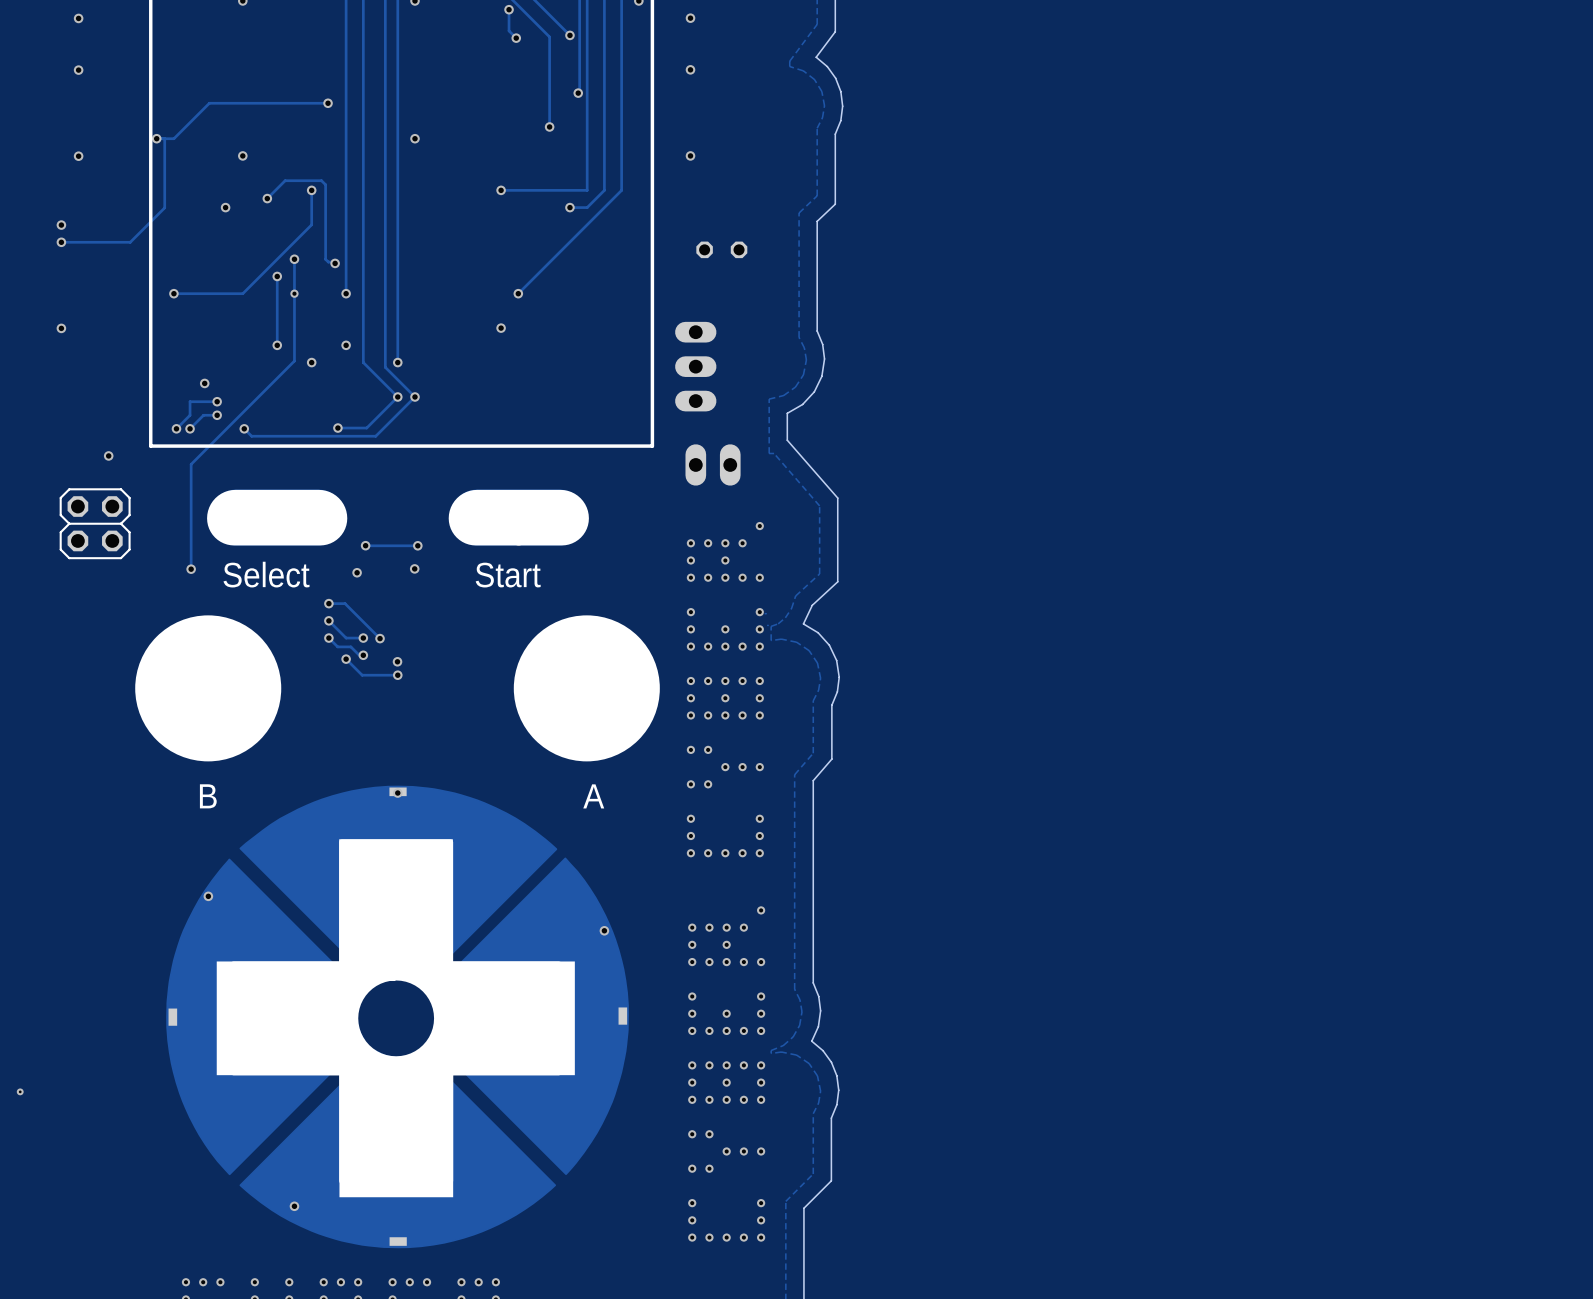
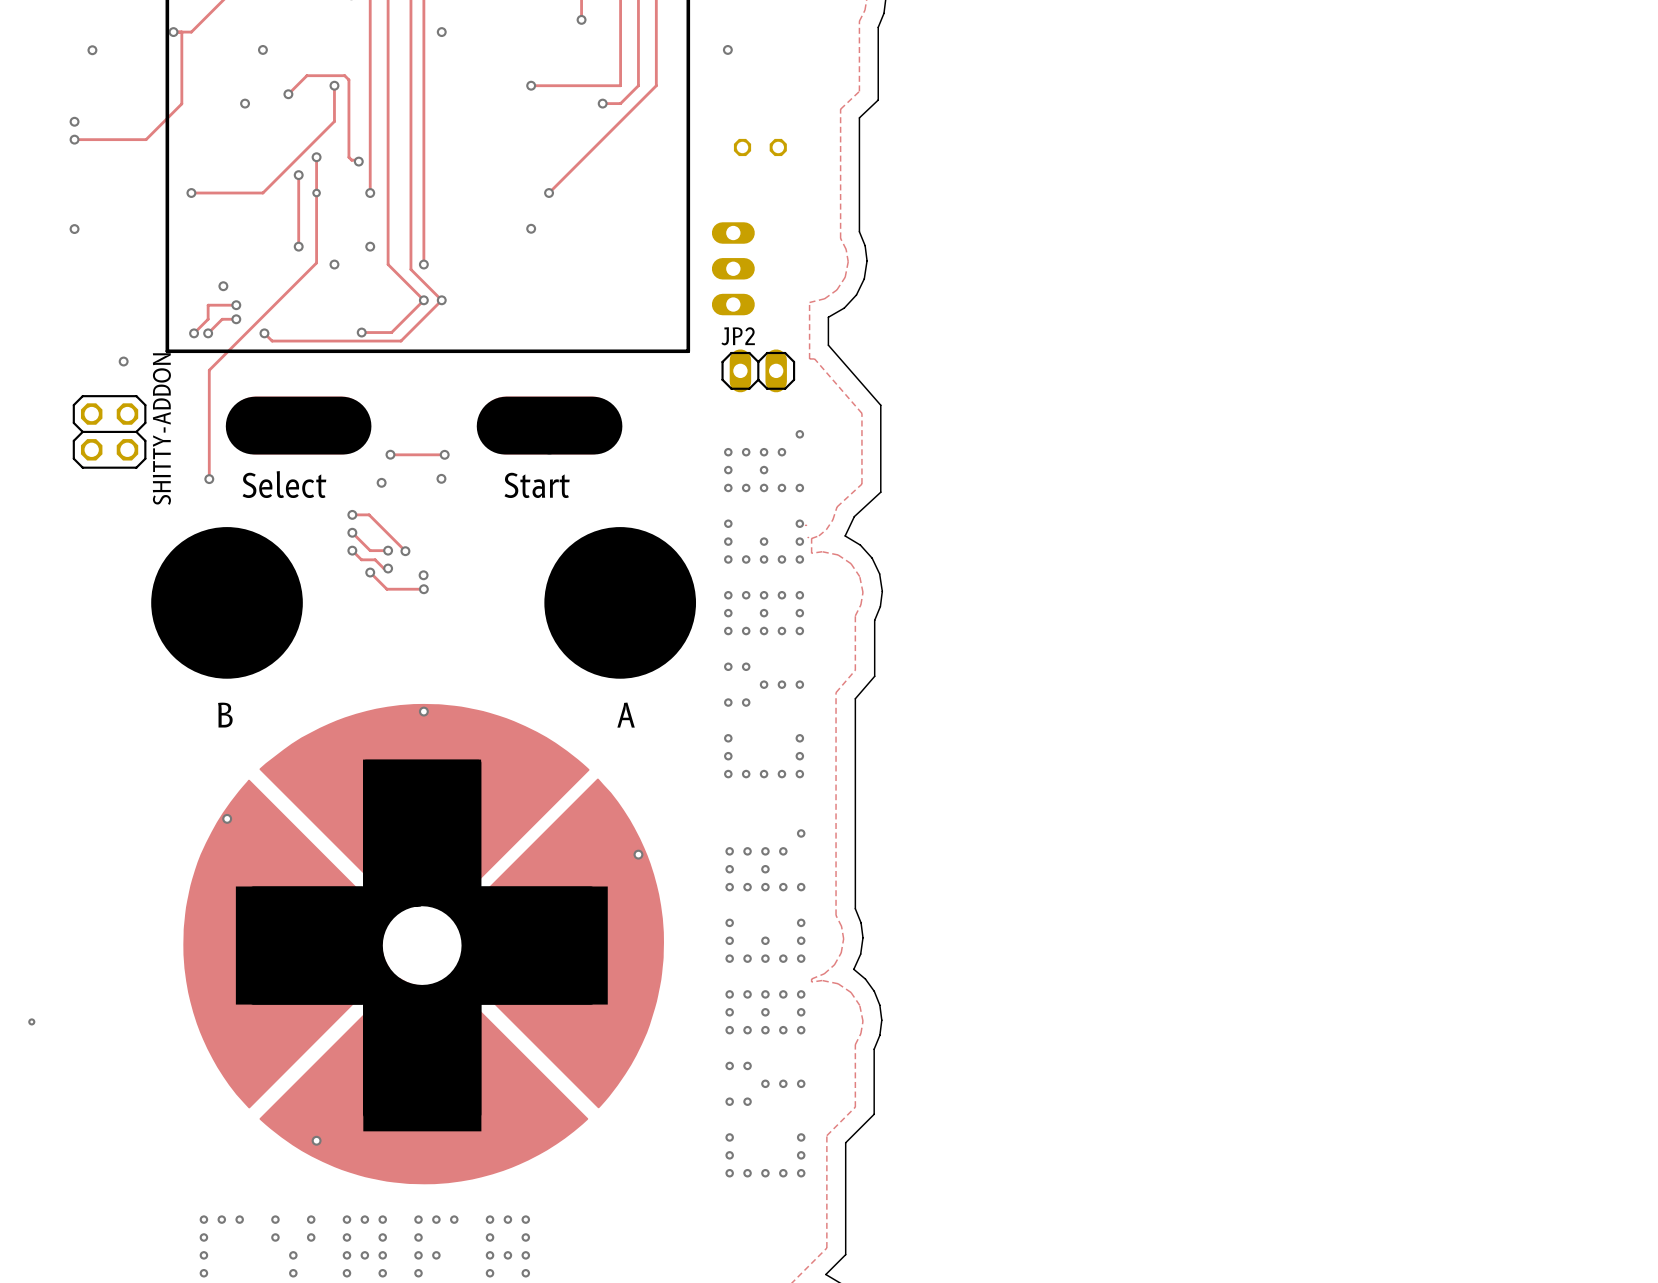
part: (713, 464) -> none
JP2: none -> (758, 370)
SHITTY-ADDON name: none -> SHITTY-ADDON (161, 429)

